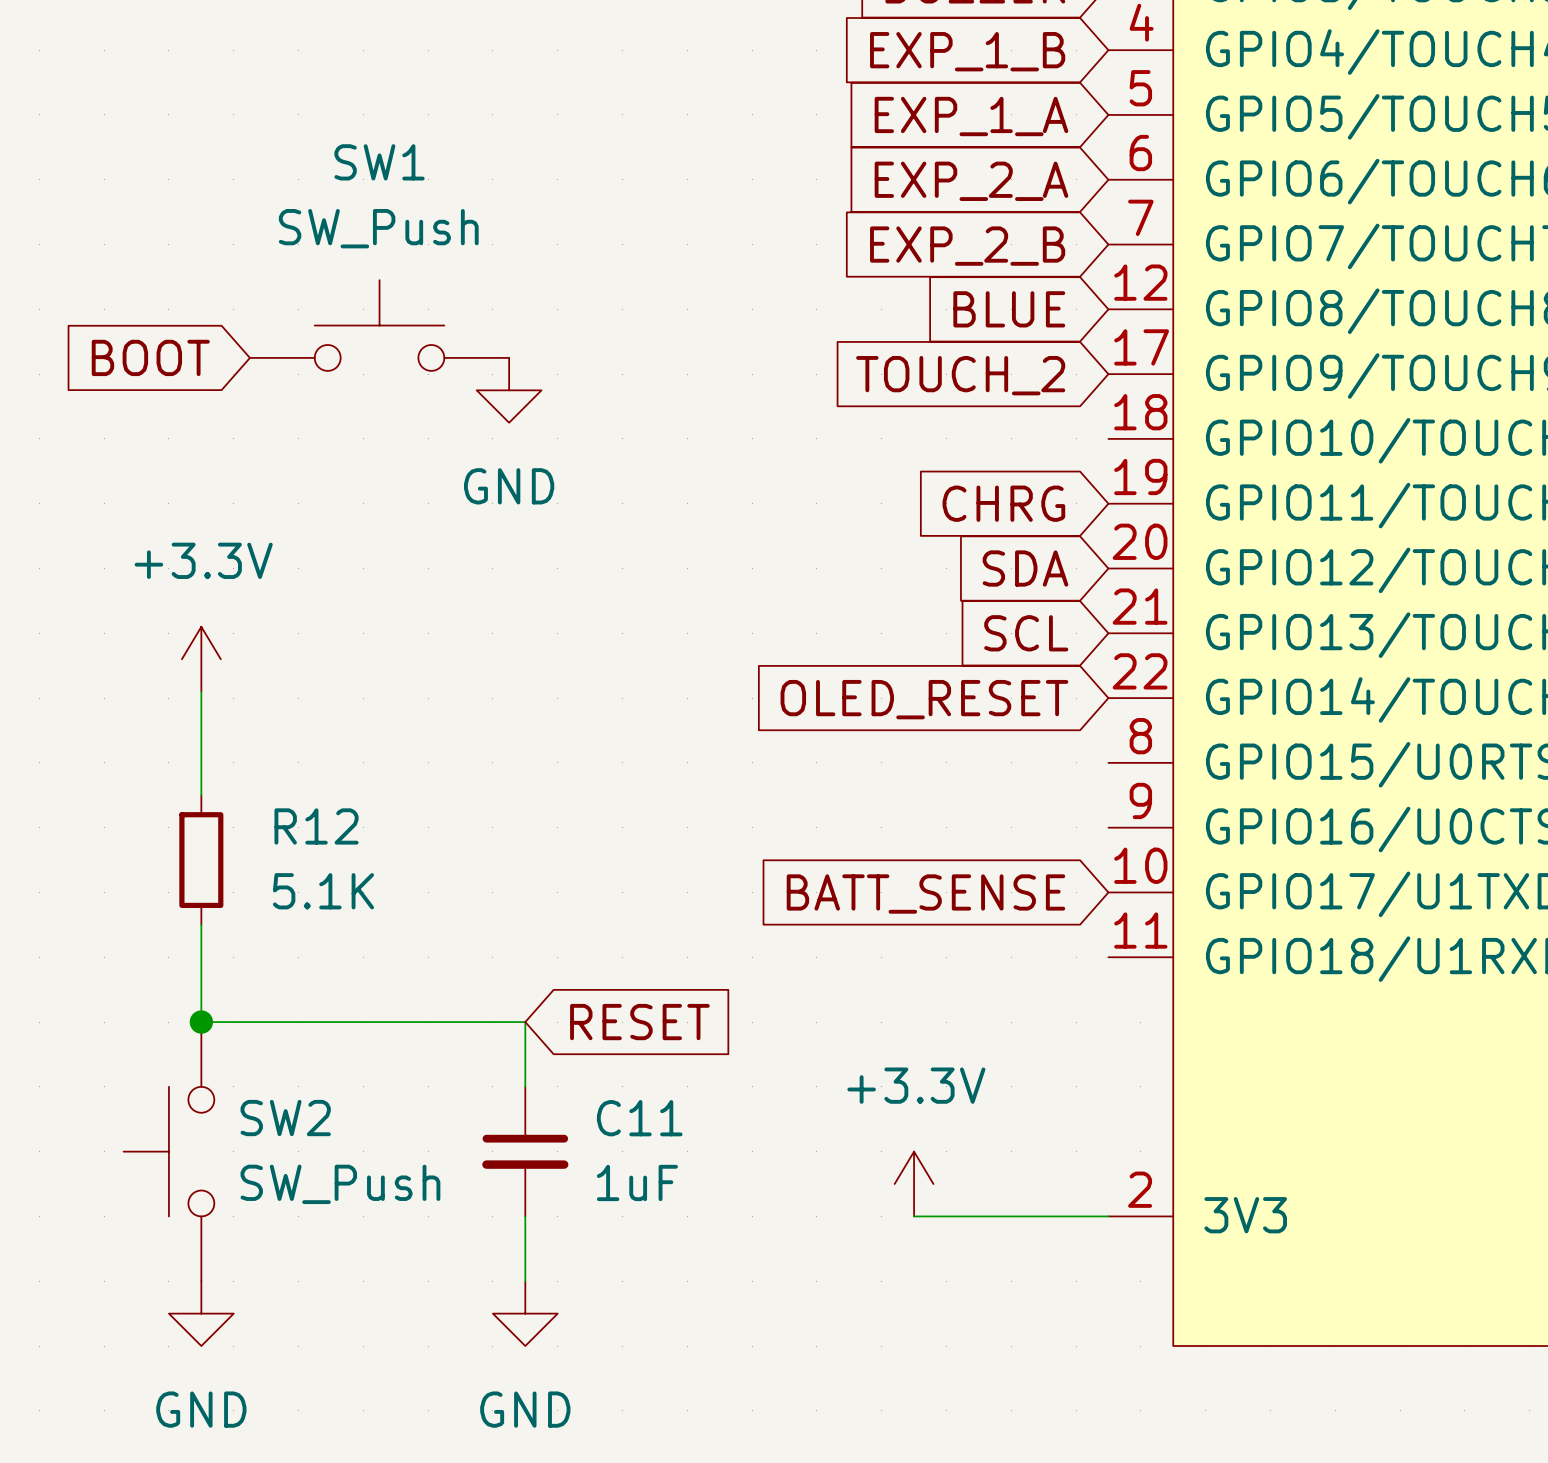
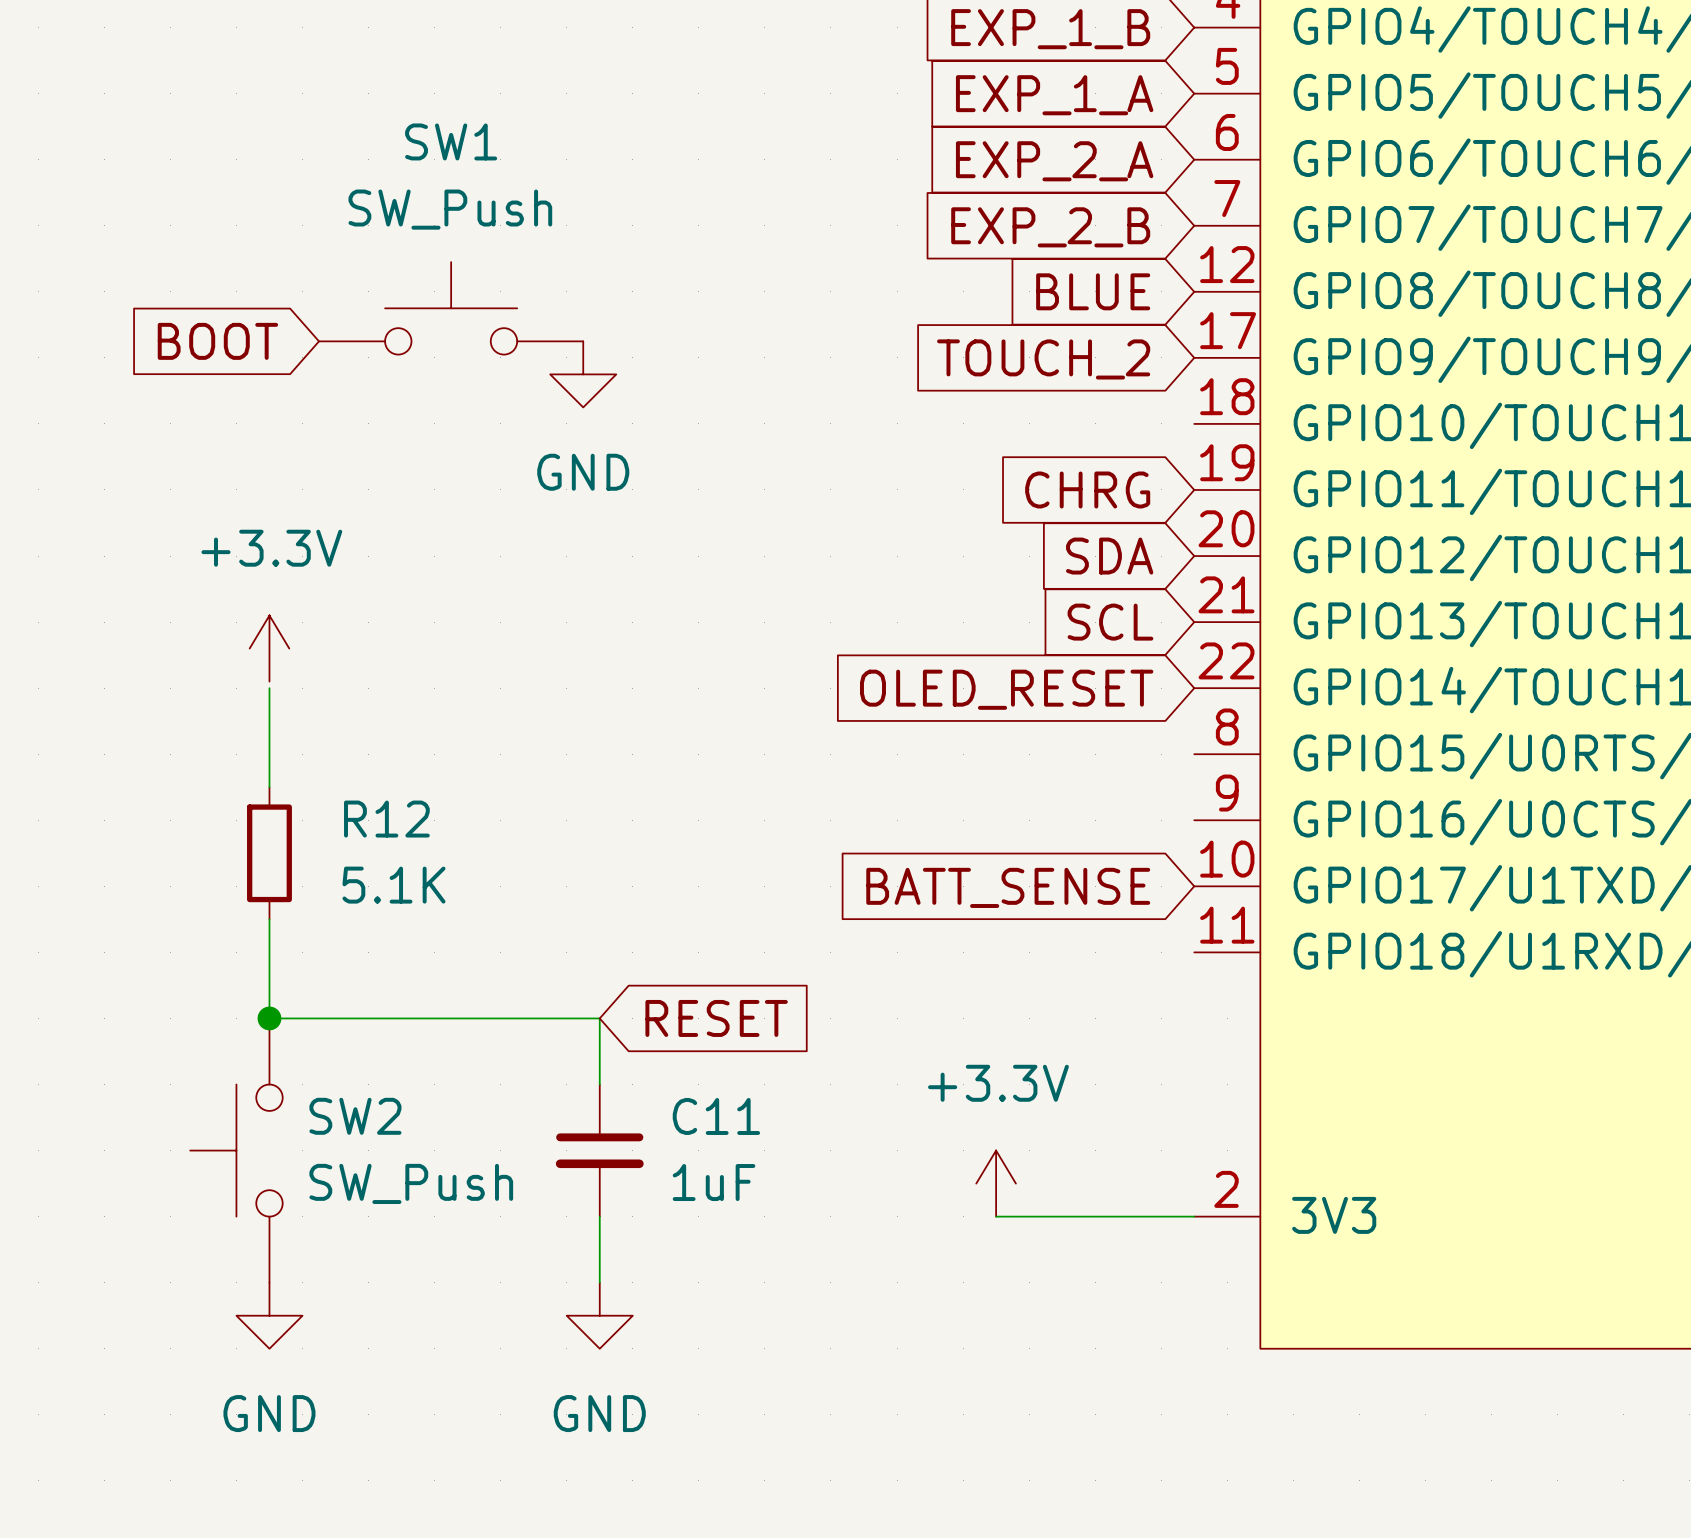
wire: (201, 691) (201, 698) -> none

